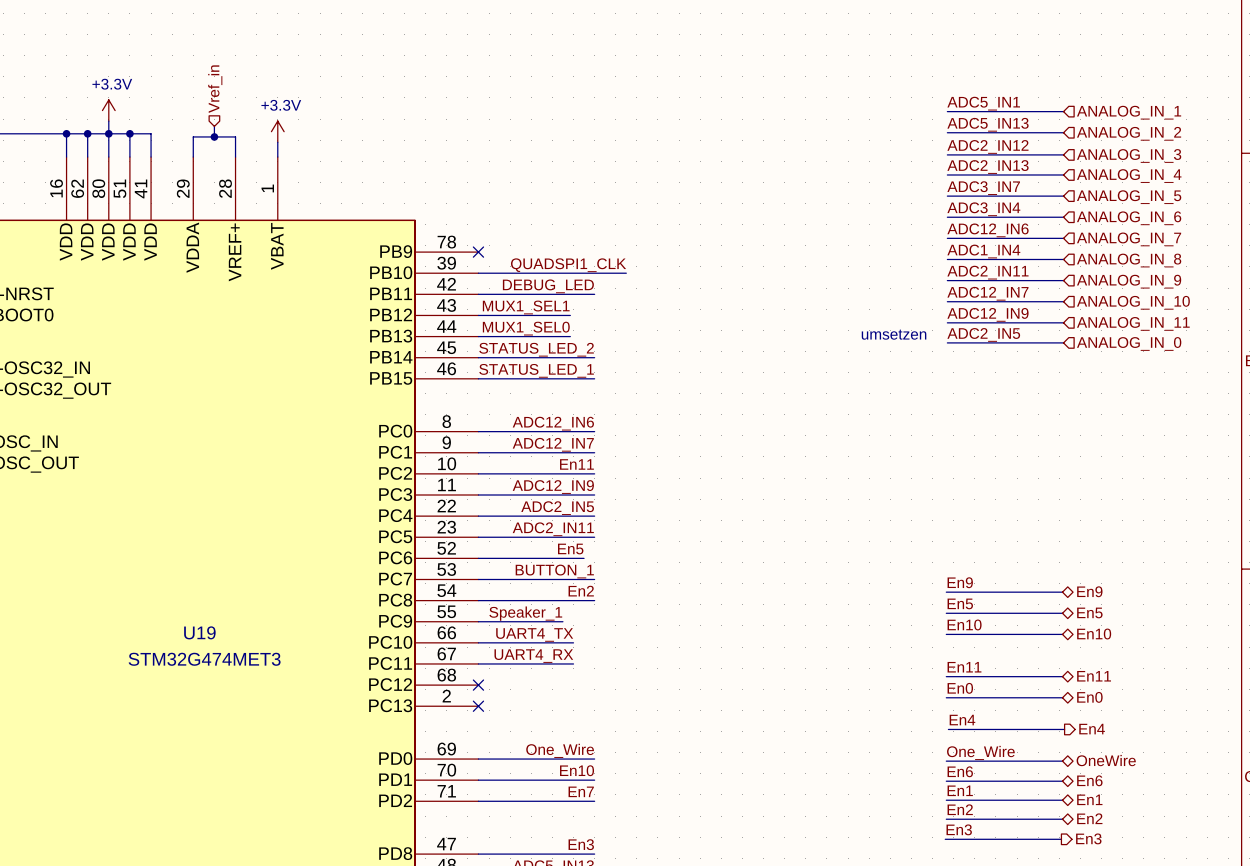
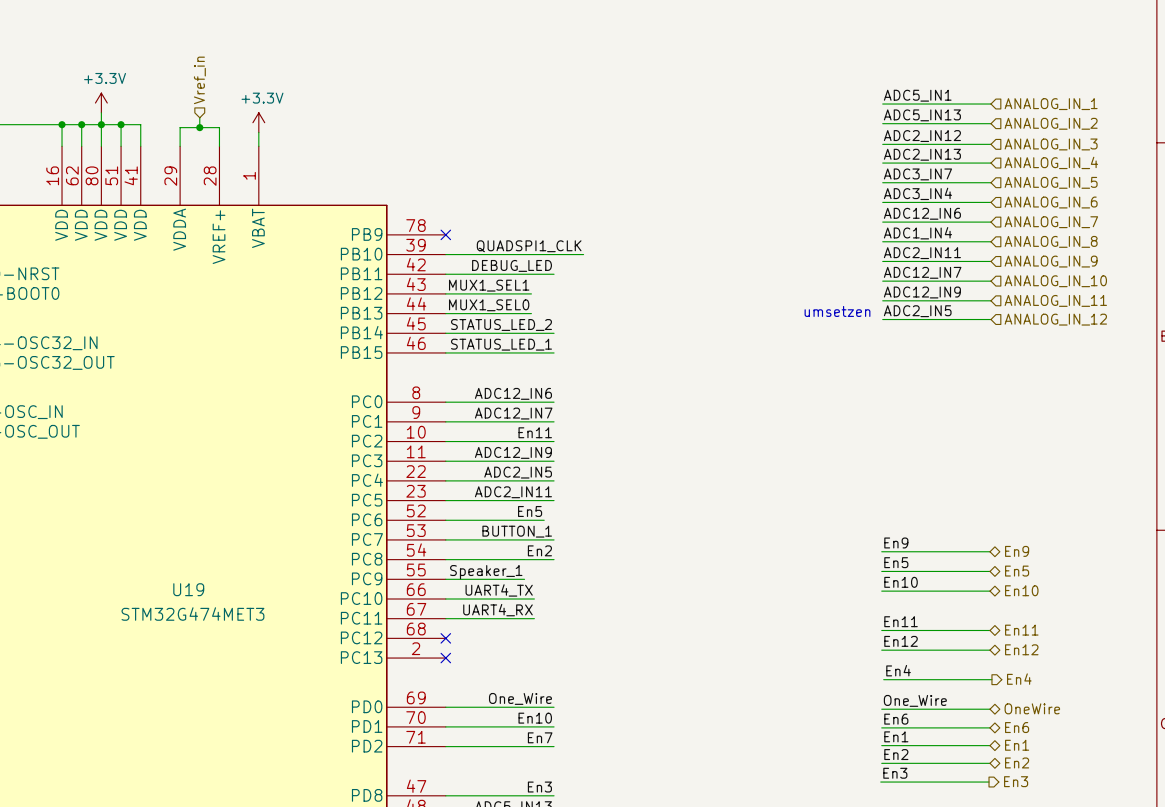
hierarchical label: ANALOG_IN_0 (1129, 343) -> ANALOG_IN_12 (1055, 319)
label: En0 (960, 688) -> En12 (901, 641)
hierarchical label: En0 (1089, 697) -> En12 (1021, 649)

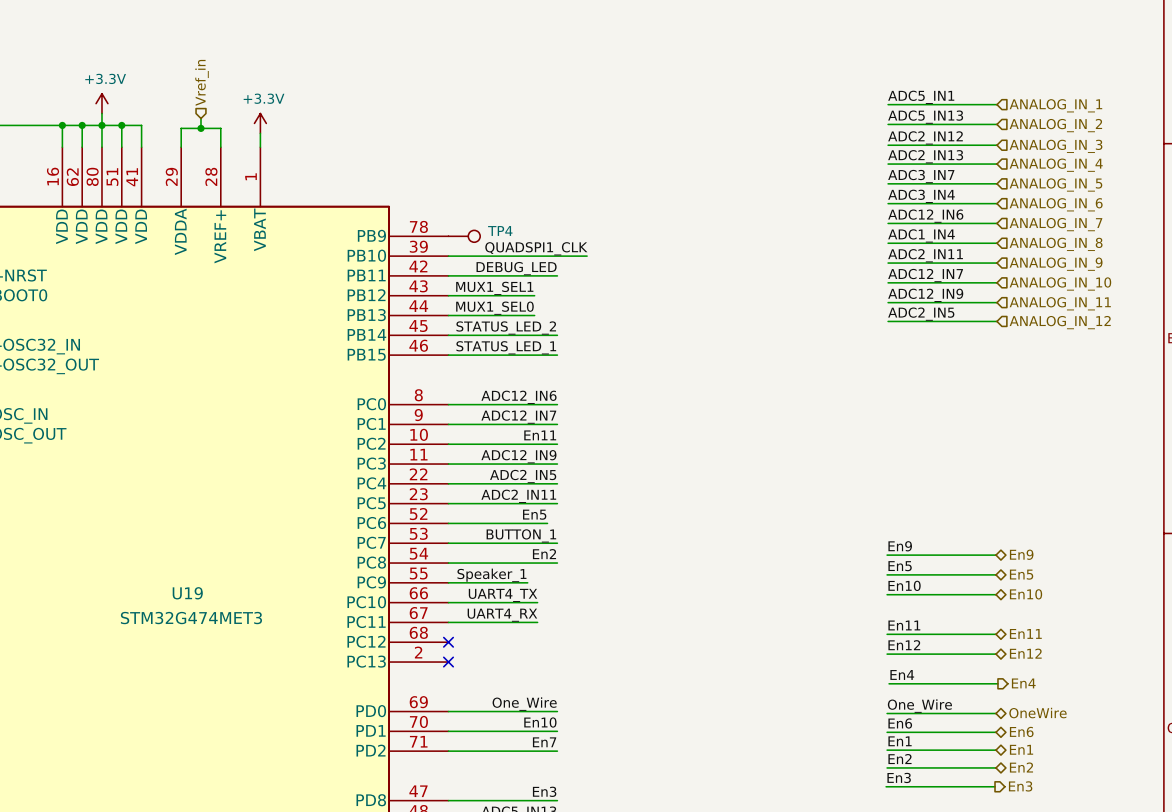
no-connect mark: (445, 234) -> none
TP4: none -> (464, 236)
text: umsetzen (837, 311) -> none

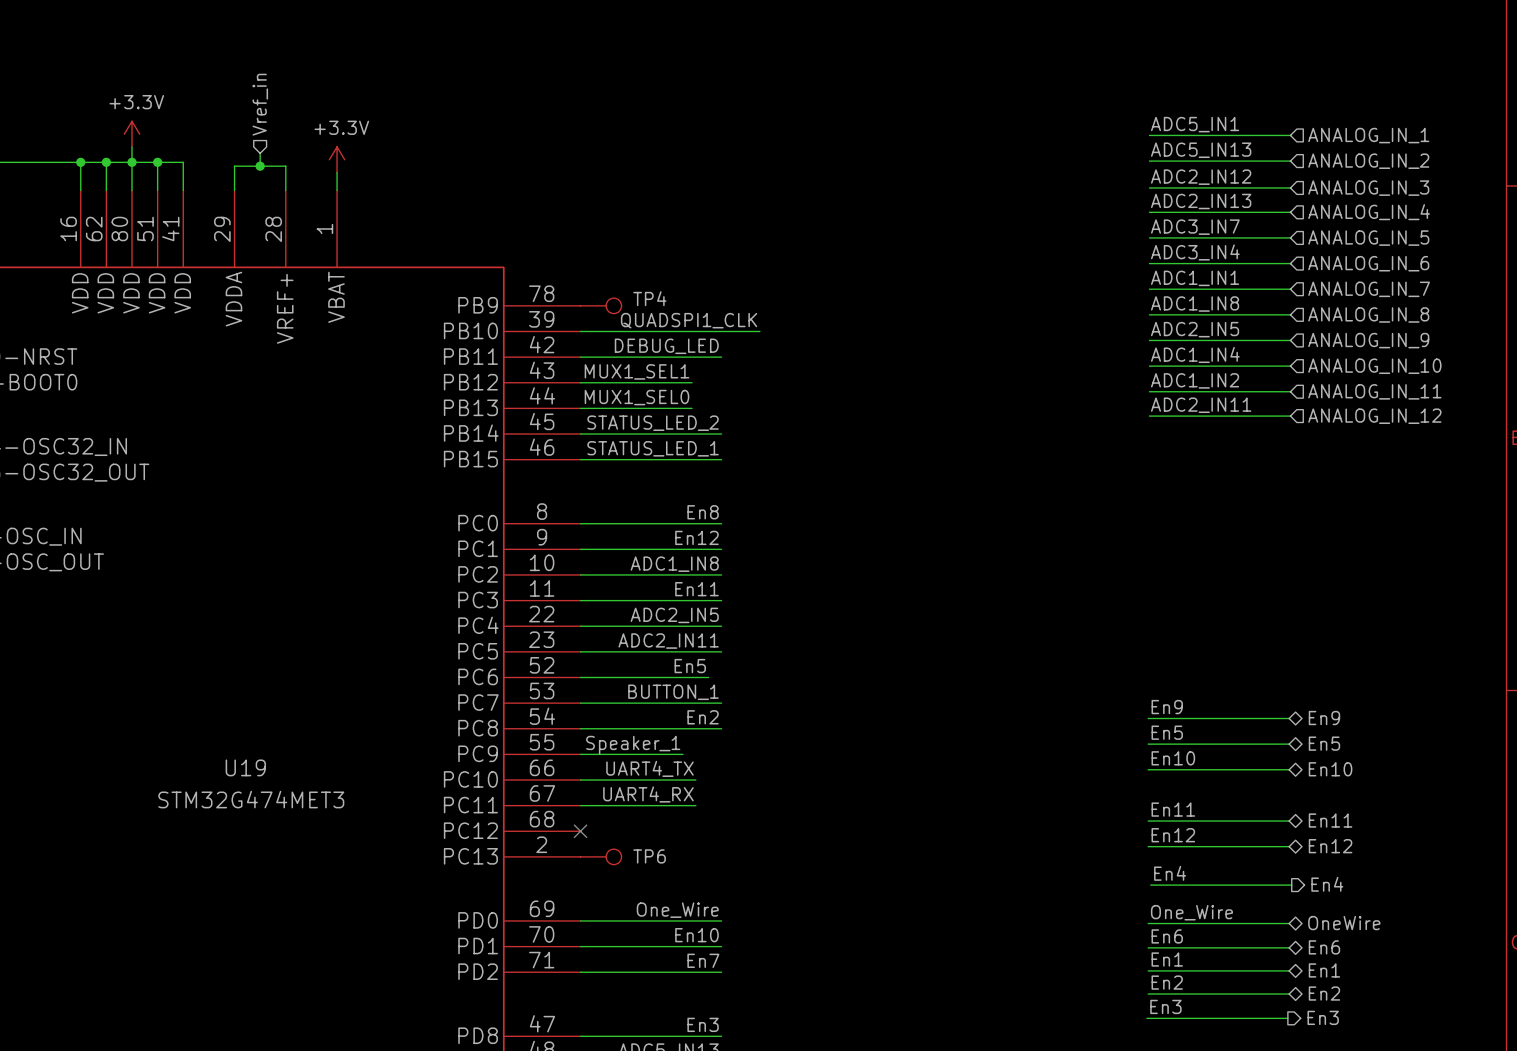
label: ADC12_IN6 (925, 216) -> ADC1_IN1 (1195, 278)
label: ADC1_IN4 (921, 235) -> ADC1_IN8 (1195, 304)
label: ADC2_IN11 (925, 255) -> ADC2_IN5 (1195, 329)
label: ADC12_IN7 (925, 275) -> ADC1_IN4 (1195, 354)
label: ADC12_IN9 (925, 295) -> ADC1_IN2 (1195, 380)
label: ADC2_IN5 (921, 314) -> ADC2_IN11 (1201, 405)
label: ADC12_IN6 (518, 397) -> En8 (703, 512)
label: ADC12_IN7 (518, 417) -> En12 (696, 537)
label: En11 (540, 435) -> ADC1_IN8 (674, 564)
label: ADC12_IN9 (518, 456) -> En11 (696, 589)
no-connect mark: (448, 662) -> none
TP6: none -> (601, 856)

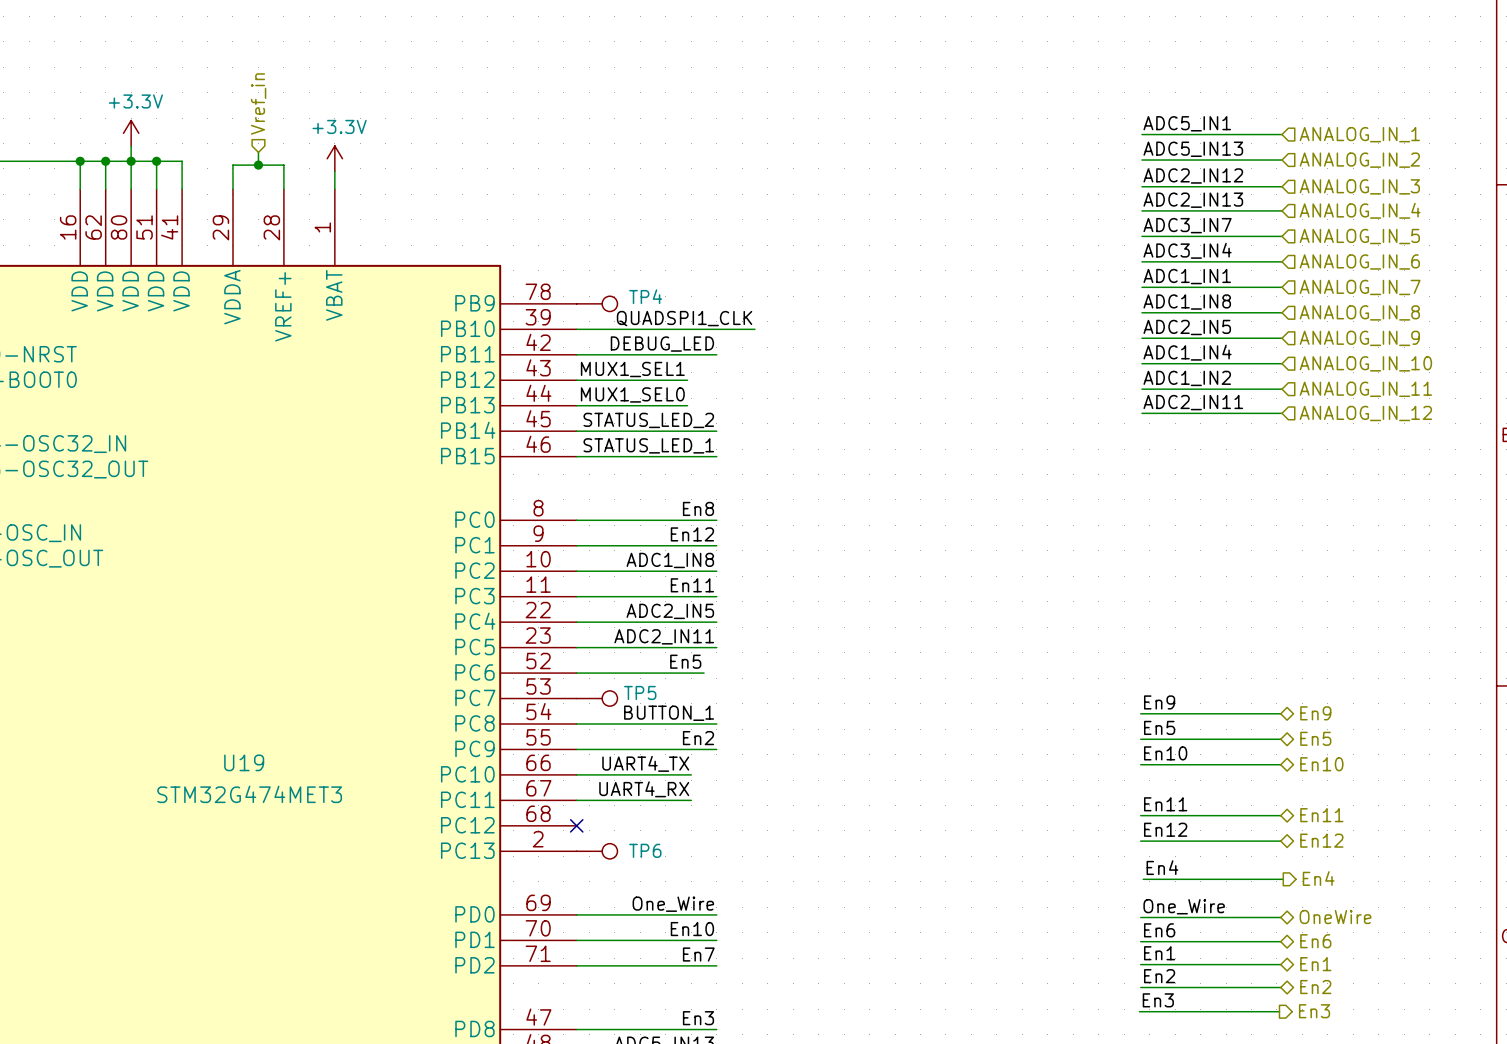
label: BUTTON_1 (673, 692) -> none
wire: (580, 703) (721, 703) -> none
TP5: none -> (597, 698)
label: En2 (703, 717) -> BUTTON_1 (669, 713)
label: none -> En2 (698, 738)
label: Speaker_1 (633, 745) -> none
wire: none -> (678, 749) (716, 749)

